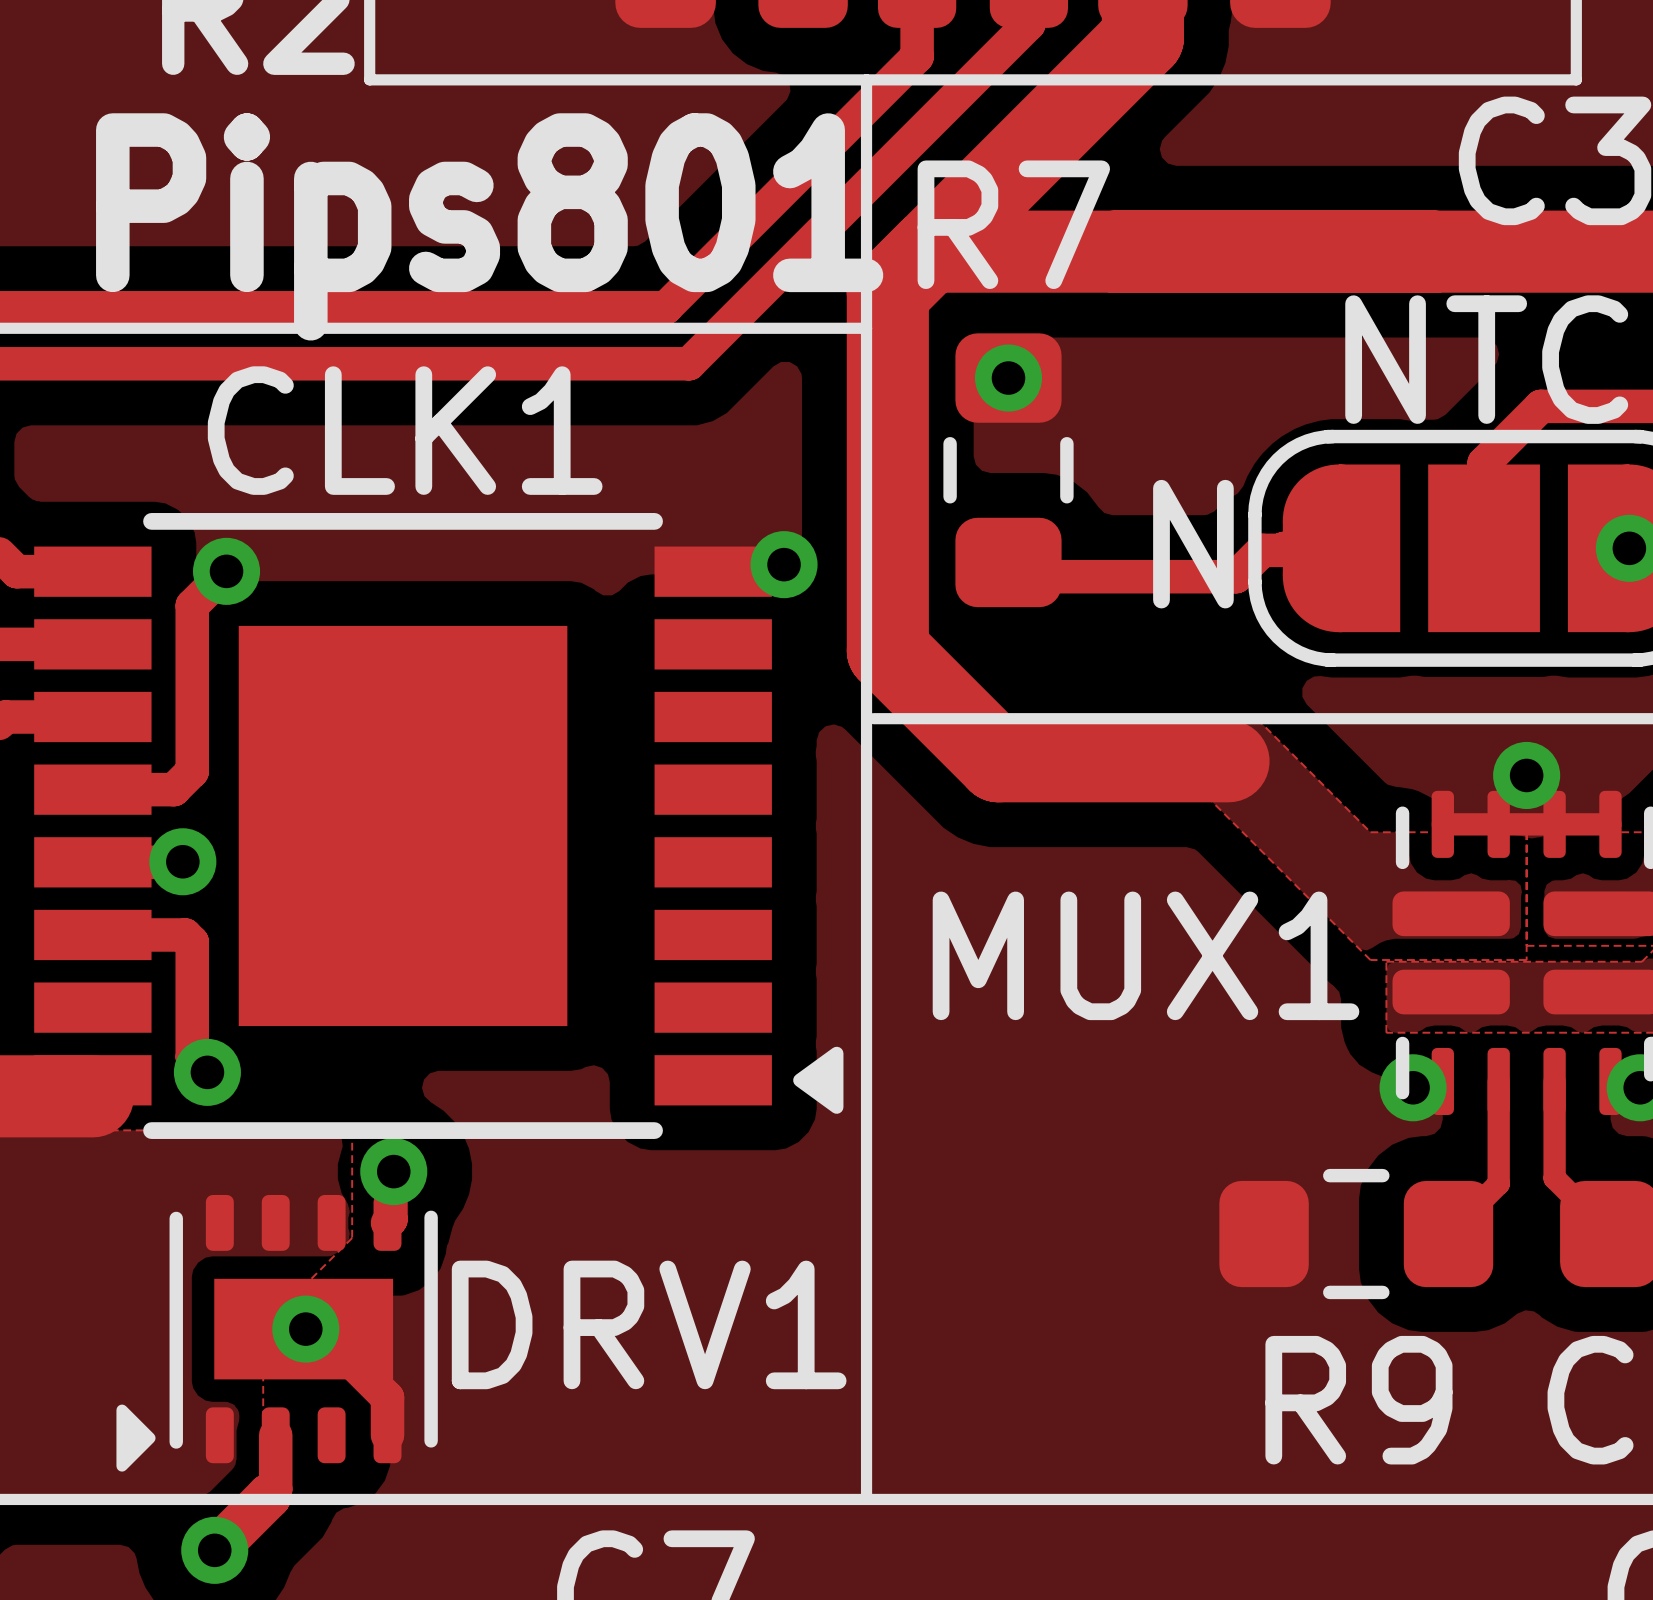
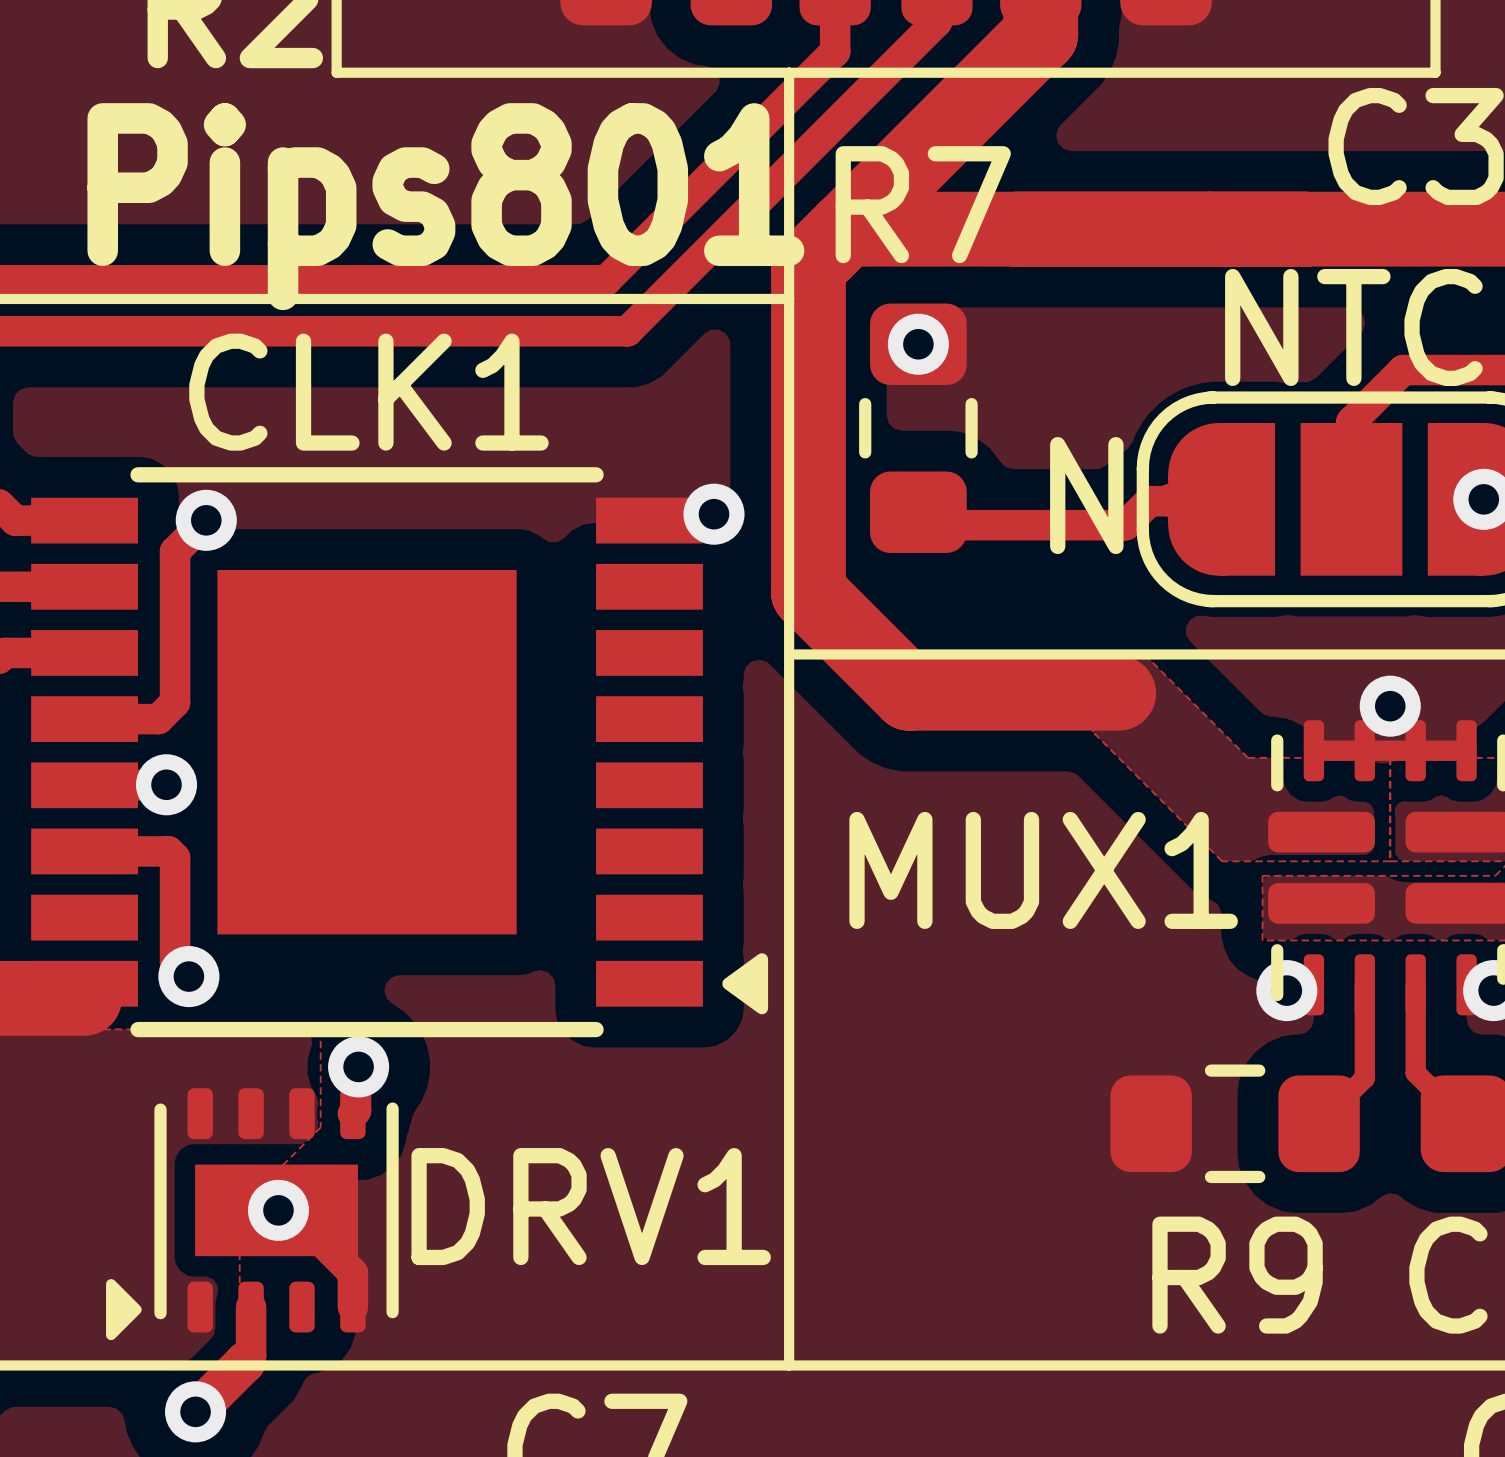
zone outline: (1200, 789) (1370, 960) (1526, 960) (1526, 945) -> (1092, 719) (1092, 732) (1222, 861) (1390, 861)

